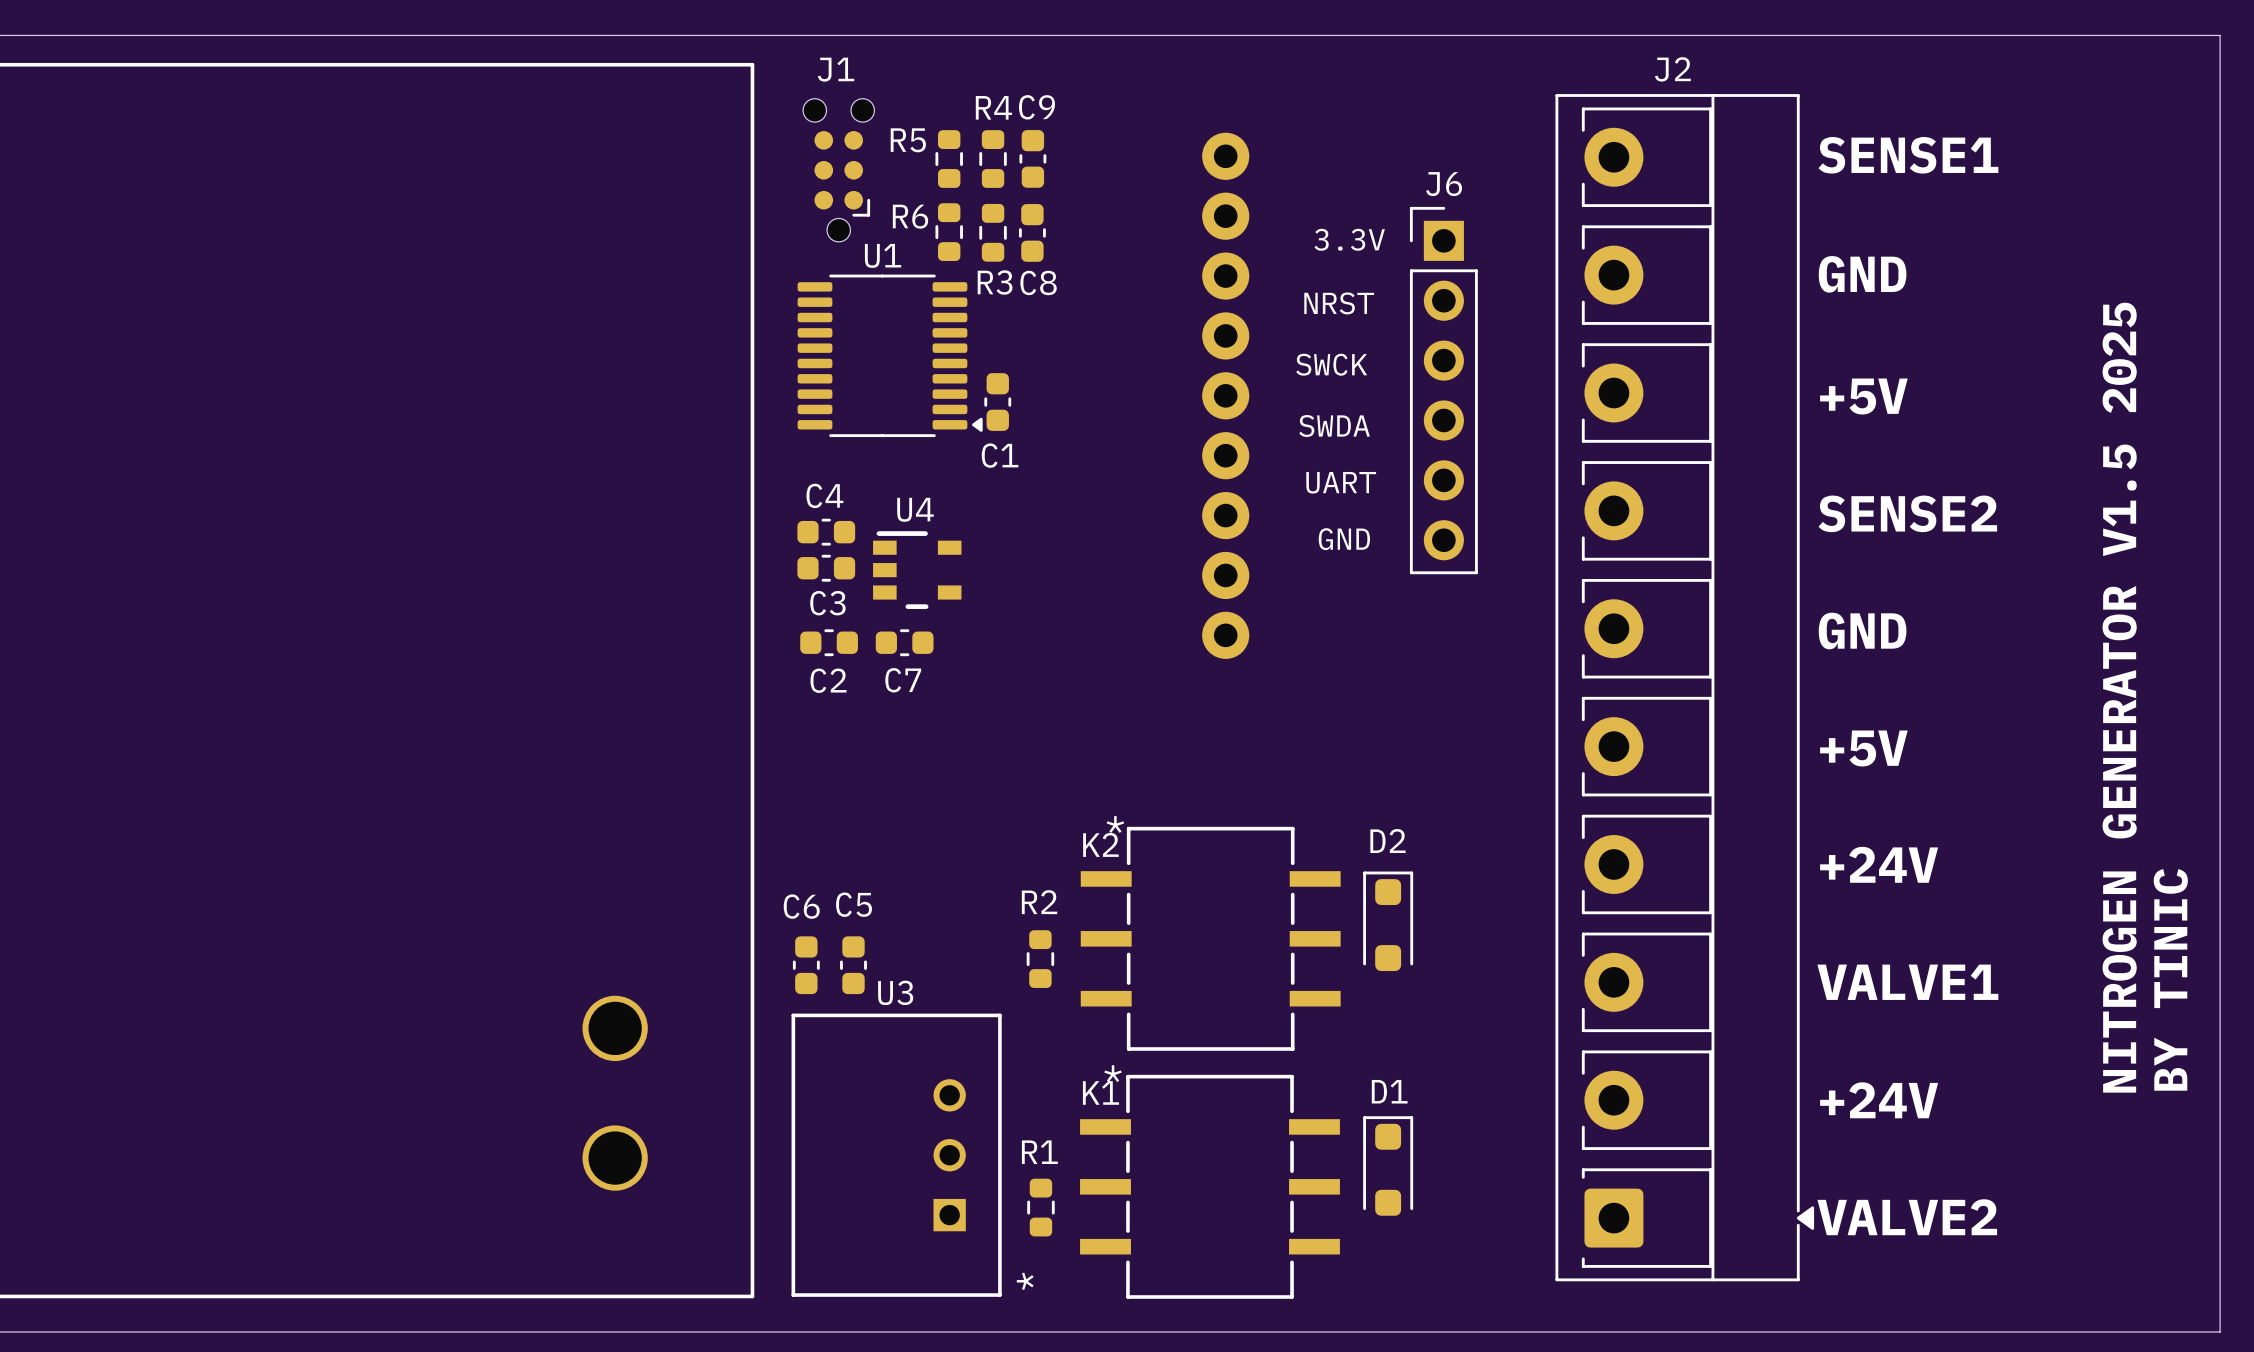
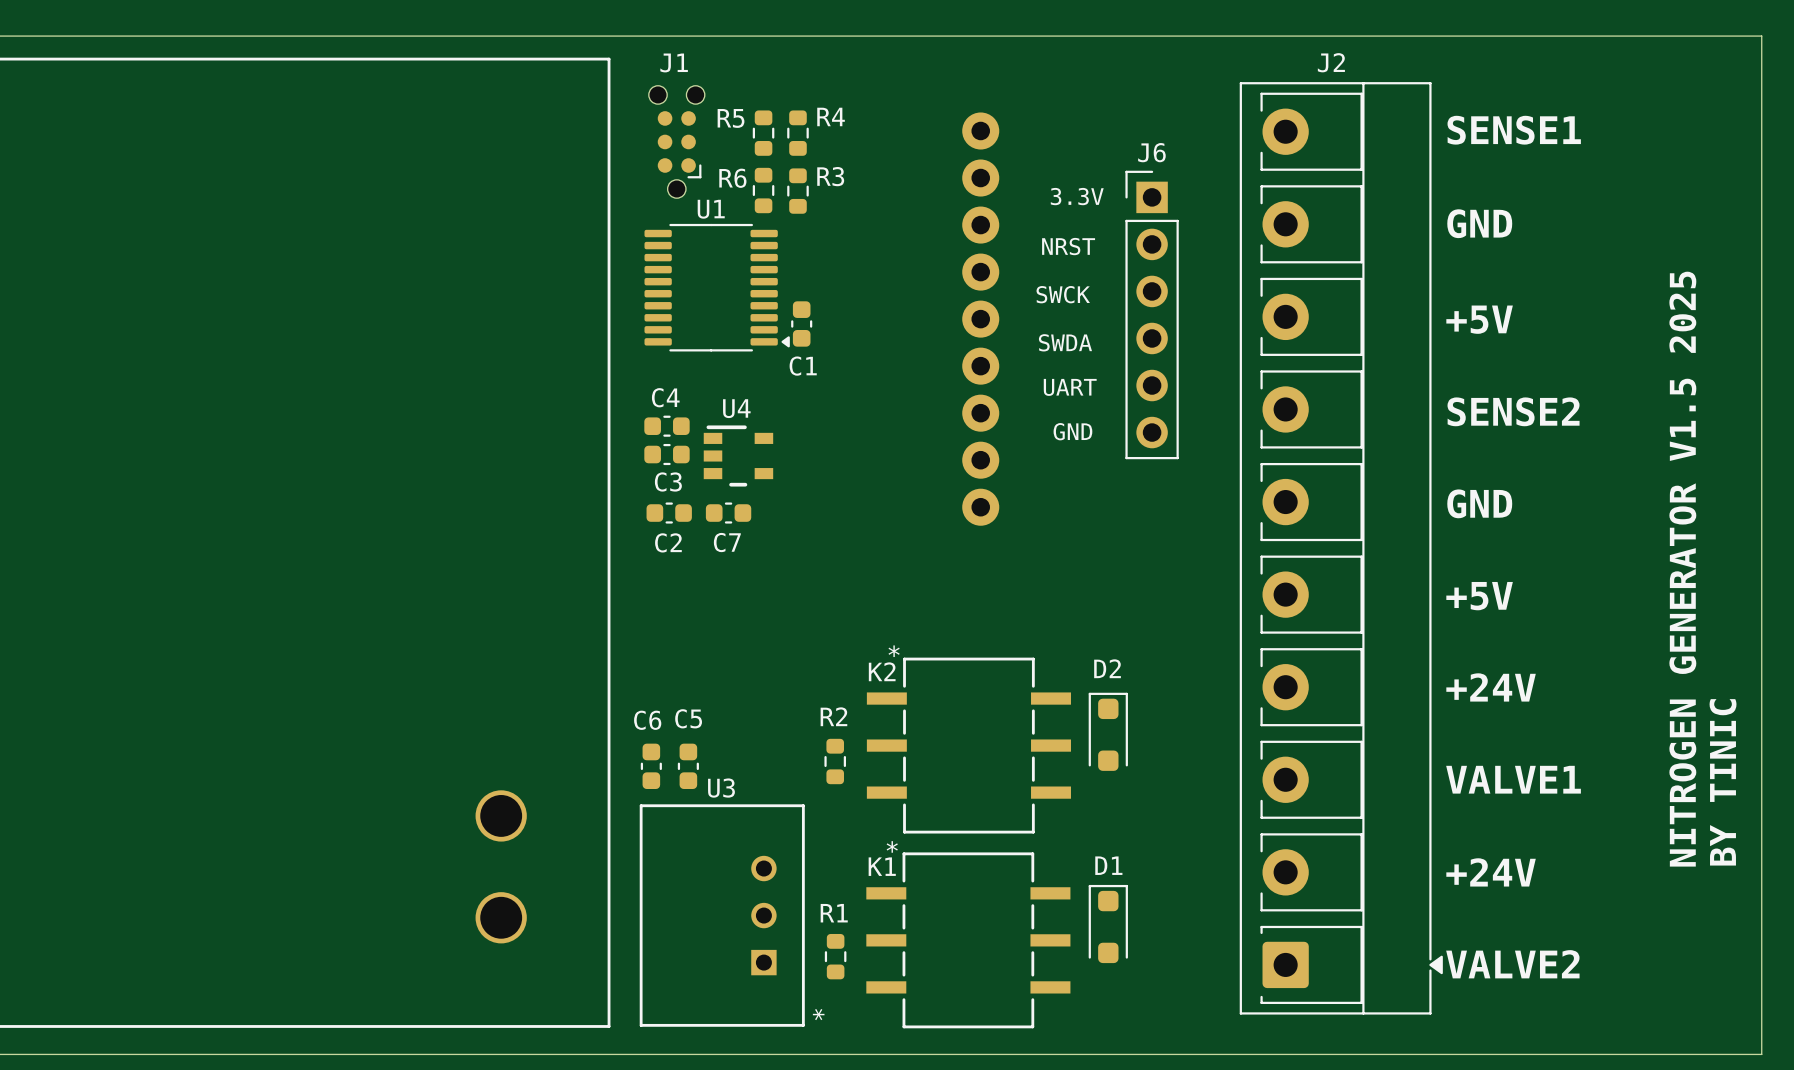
R4 name position: R4 (993, 107) -> R4 (831, 116)
C9: (1032, 158) -> none
C8: (1032, 232) -> none
R3 name position: R3 (995, 282) -> R3 (830, 176)

